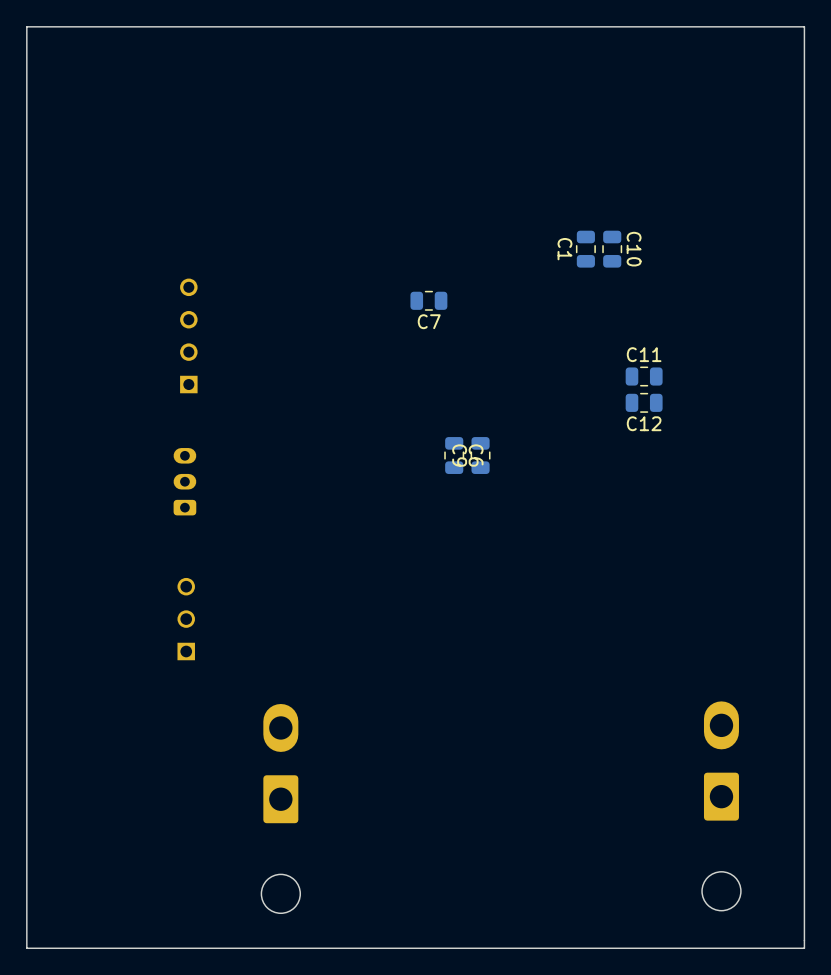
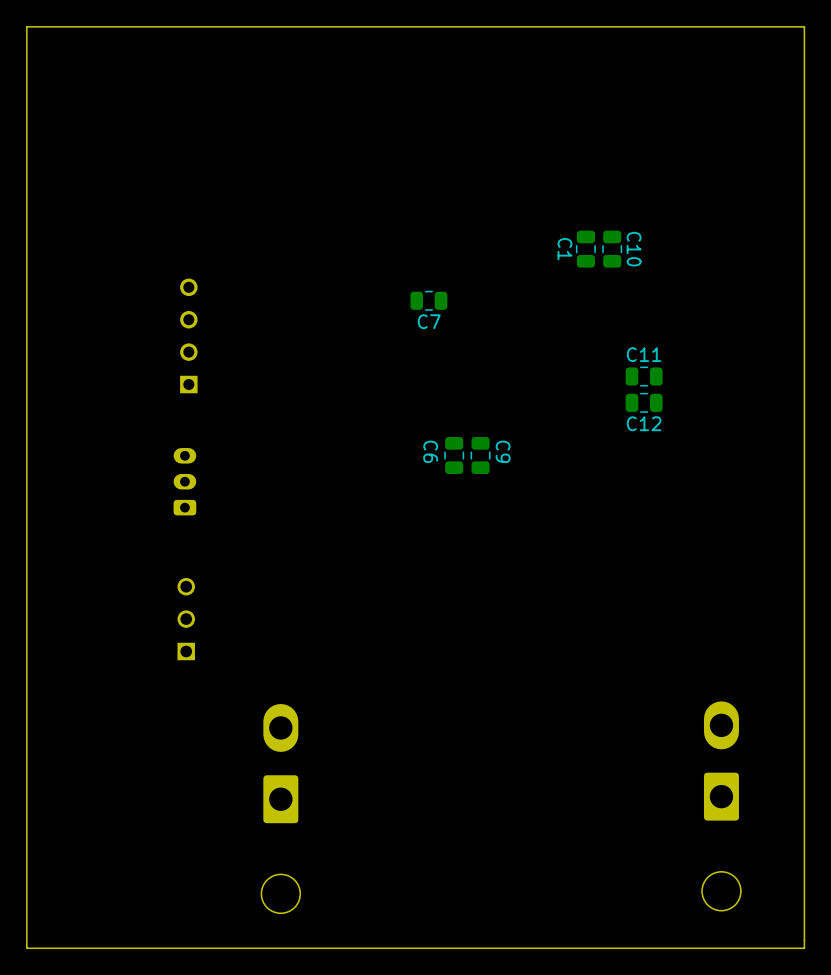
C9 name position: C9 (459, 455) -> C9 (503, 451)
C6 name position: C6 (476, 455) -> C6 (430, 451)

